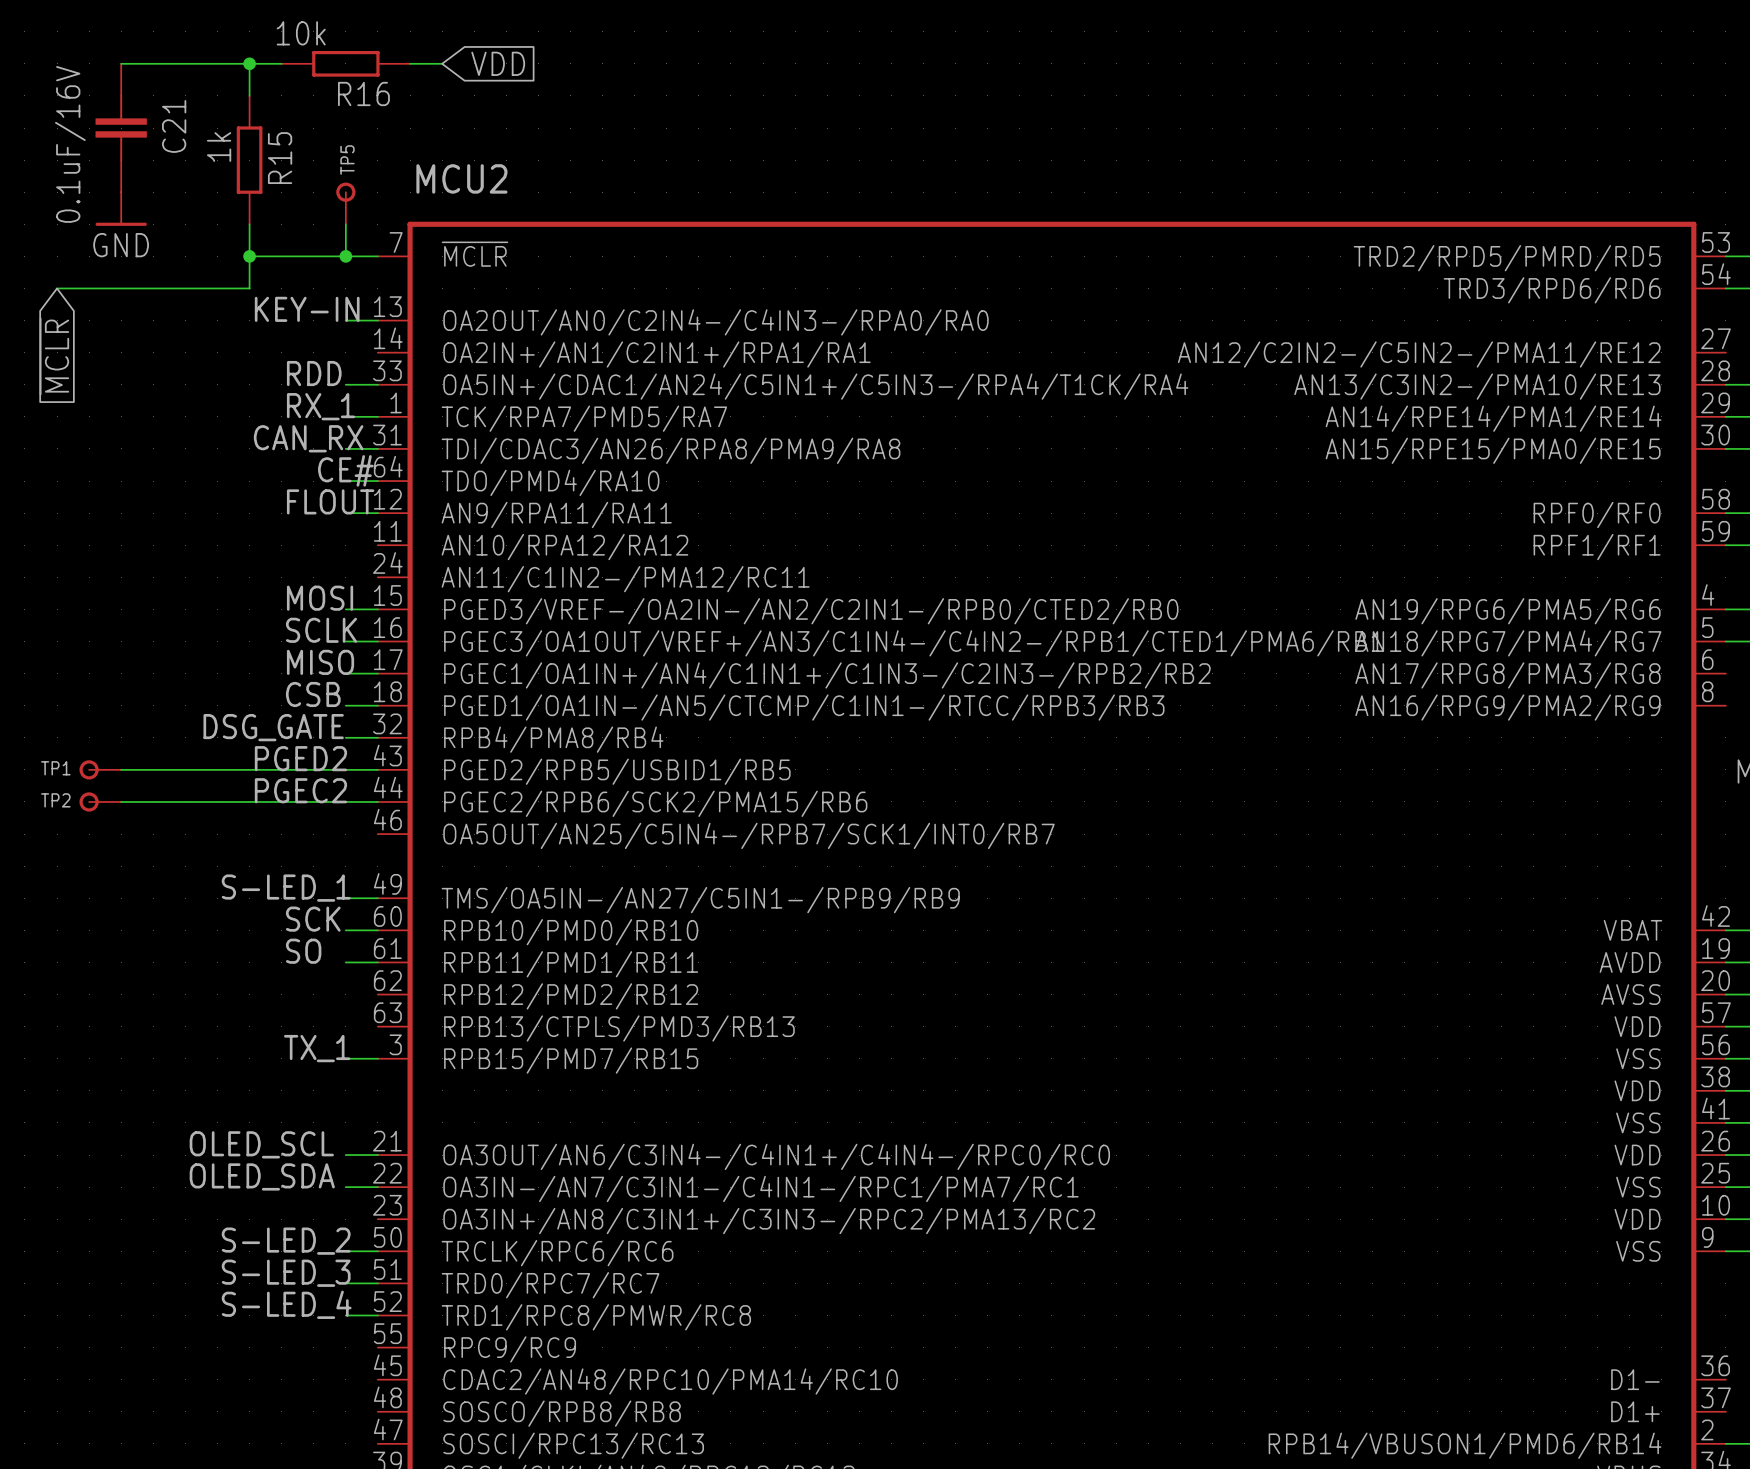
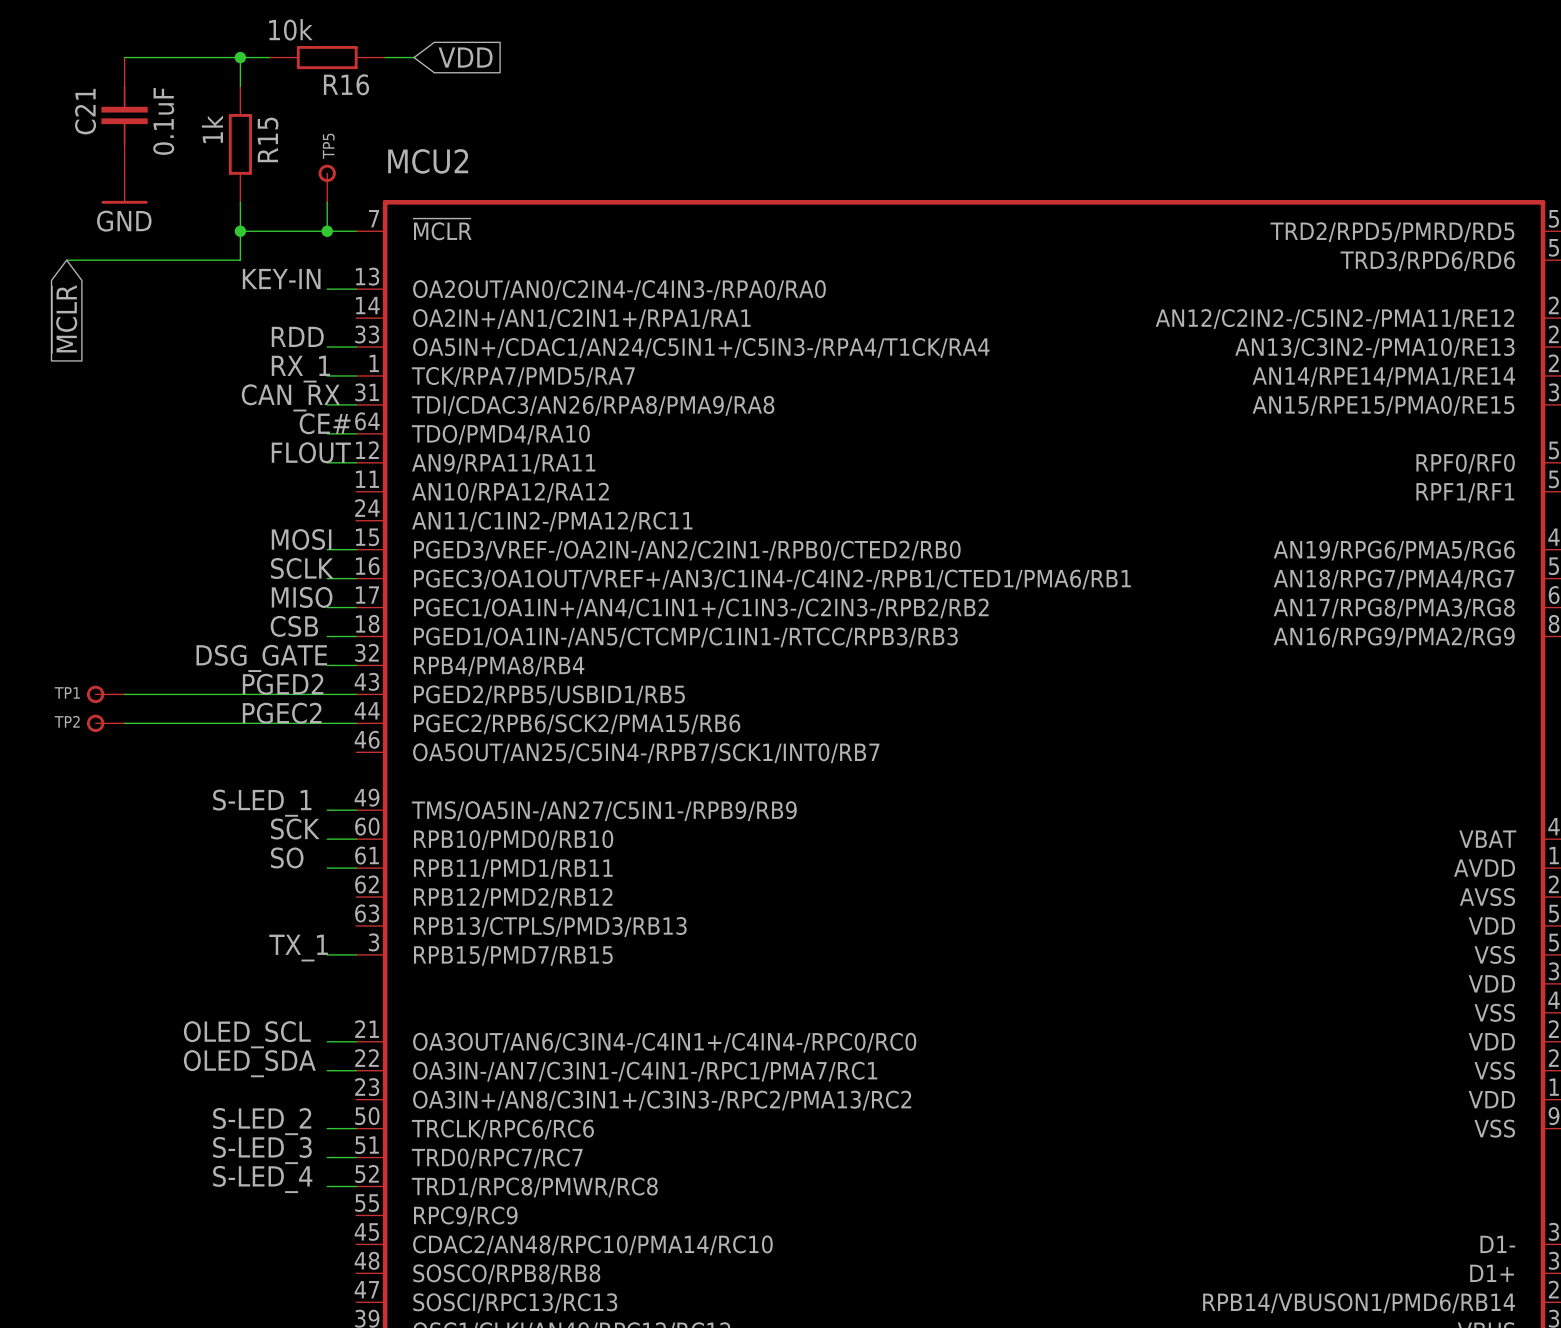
C21 name position: C21 (174, 126) -> C21 (85, 111)
C21 value: 0.1uF/16V (70, 144) -> 0.1uF (163, 121)

